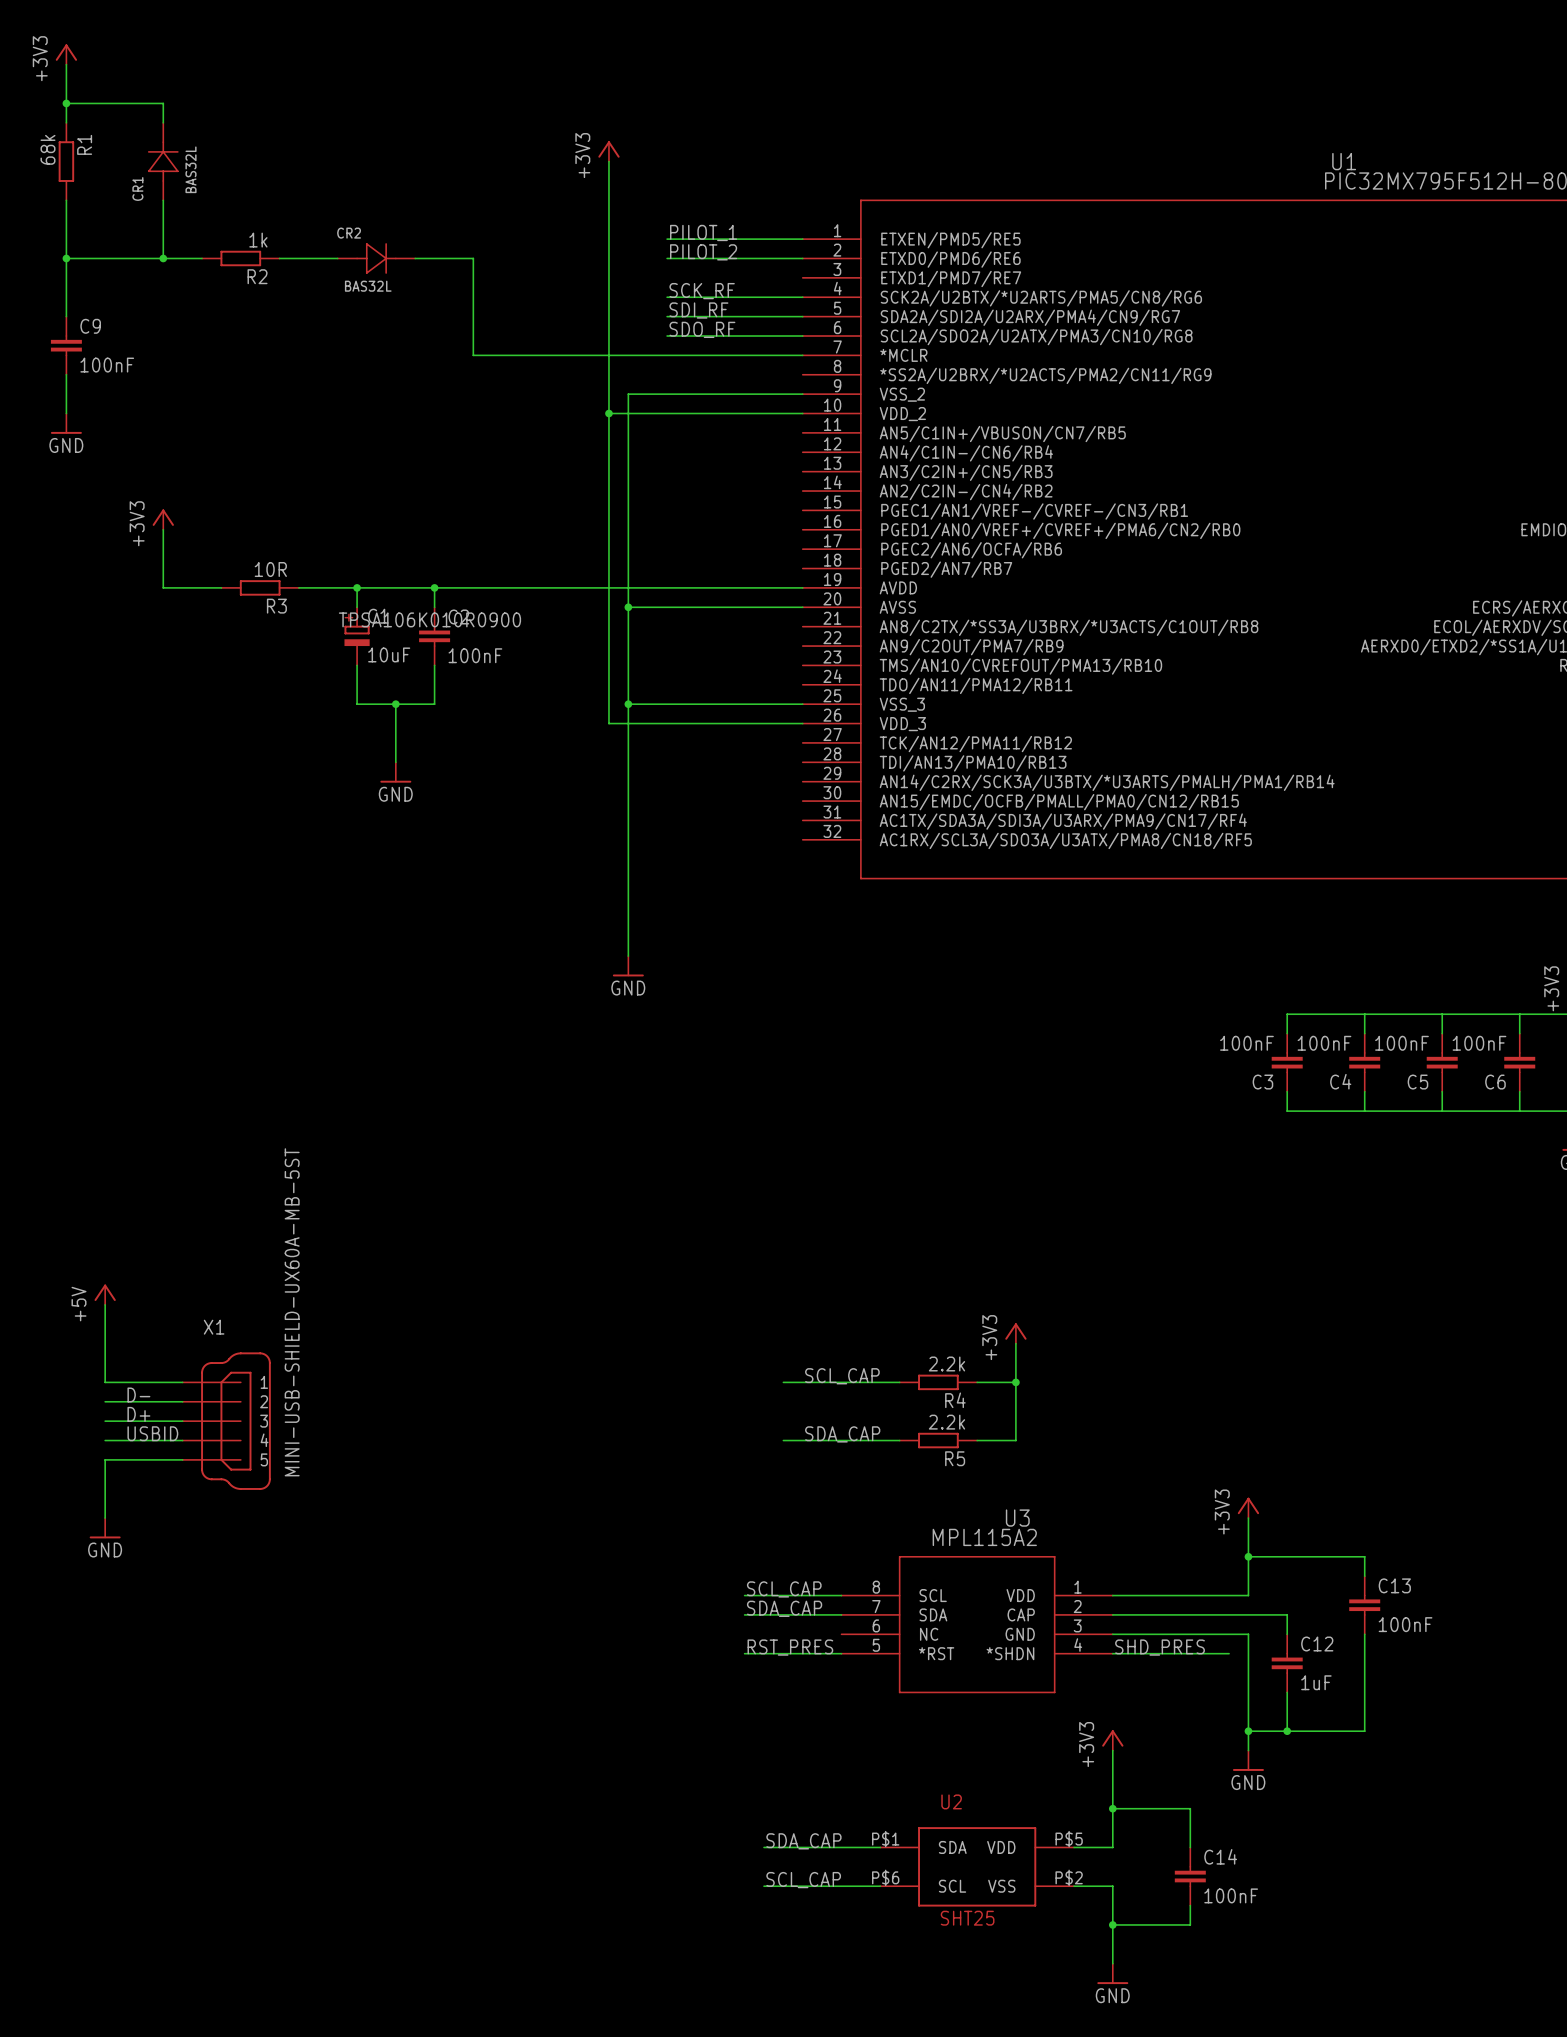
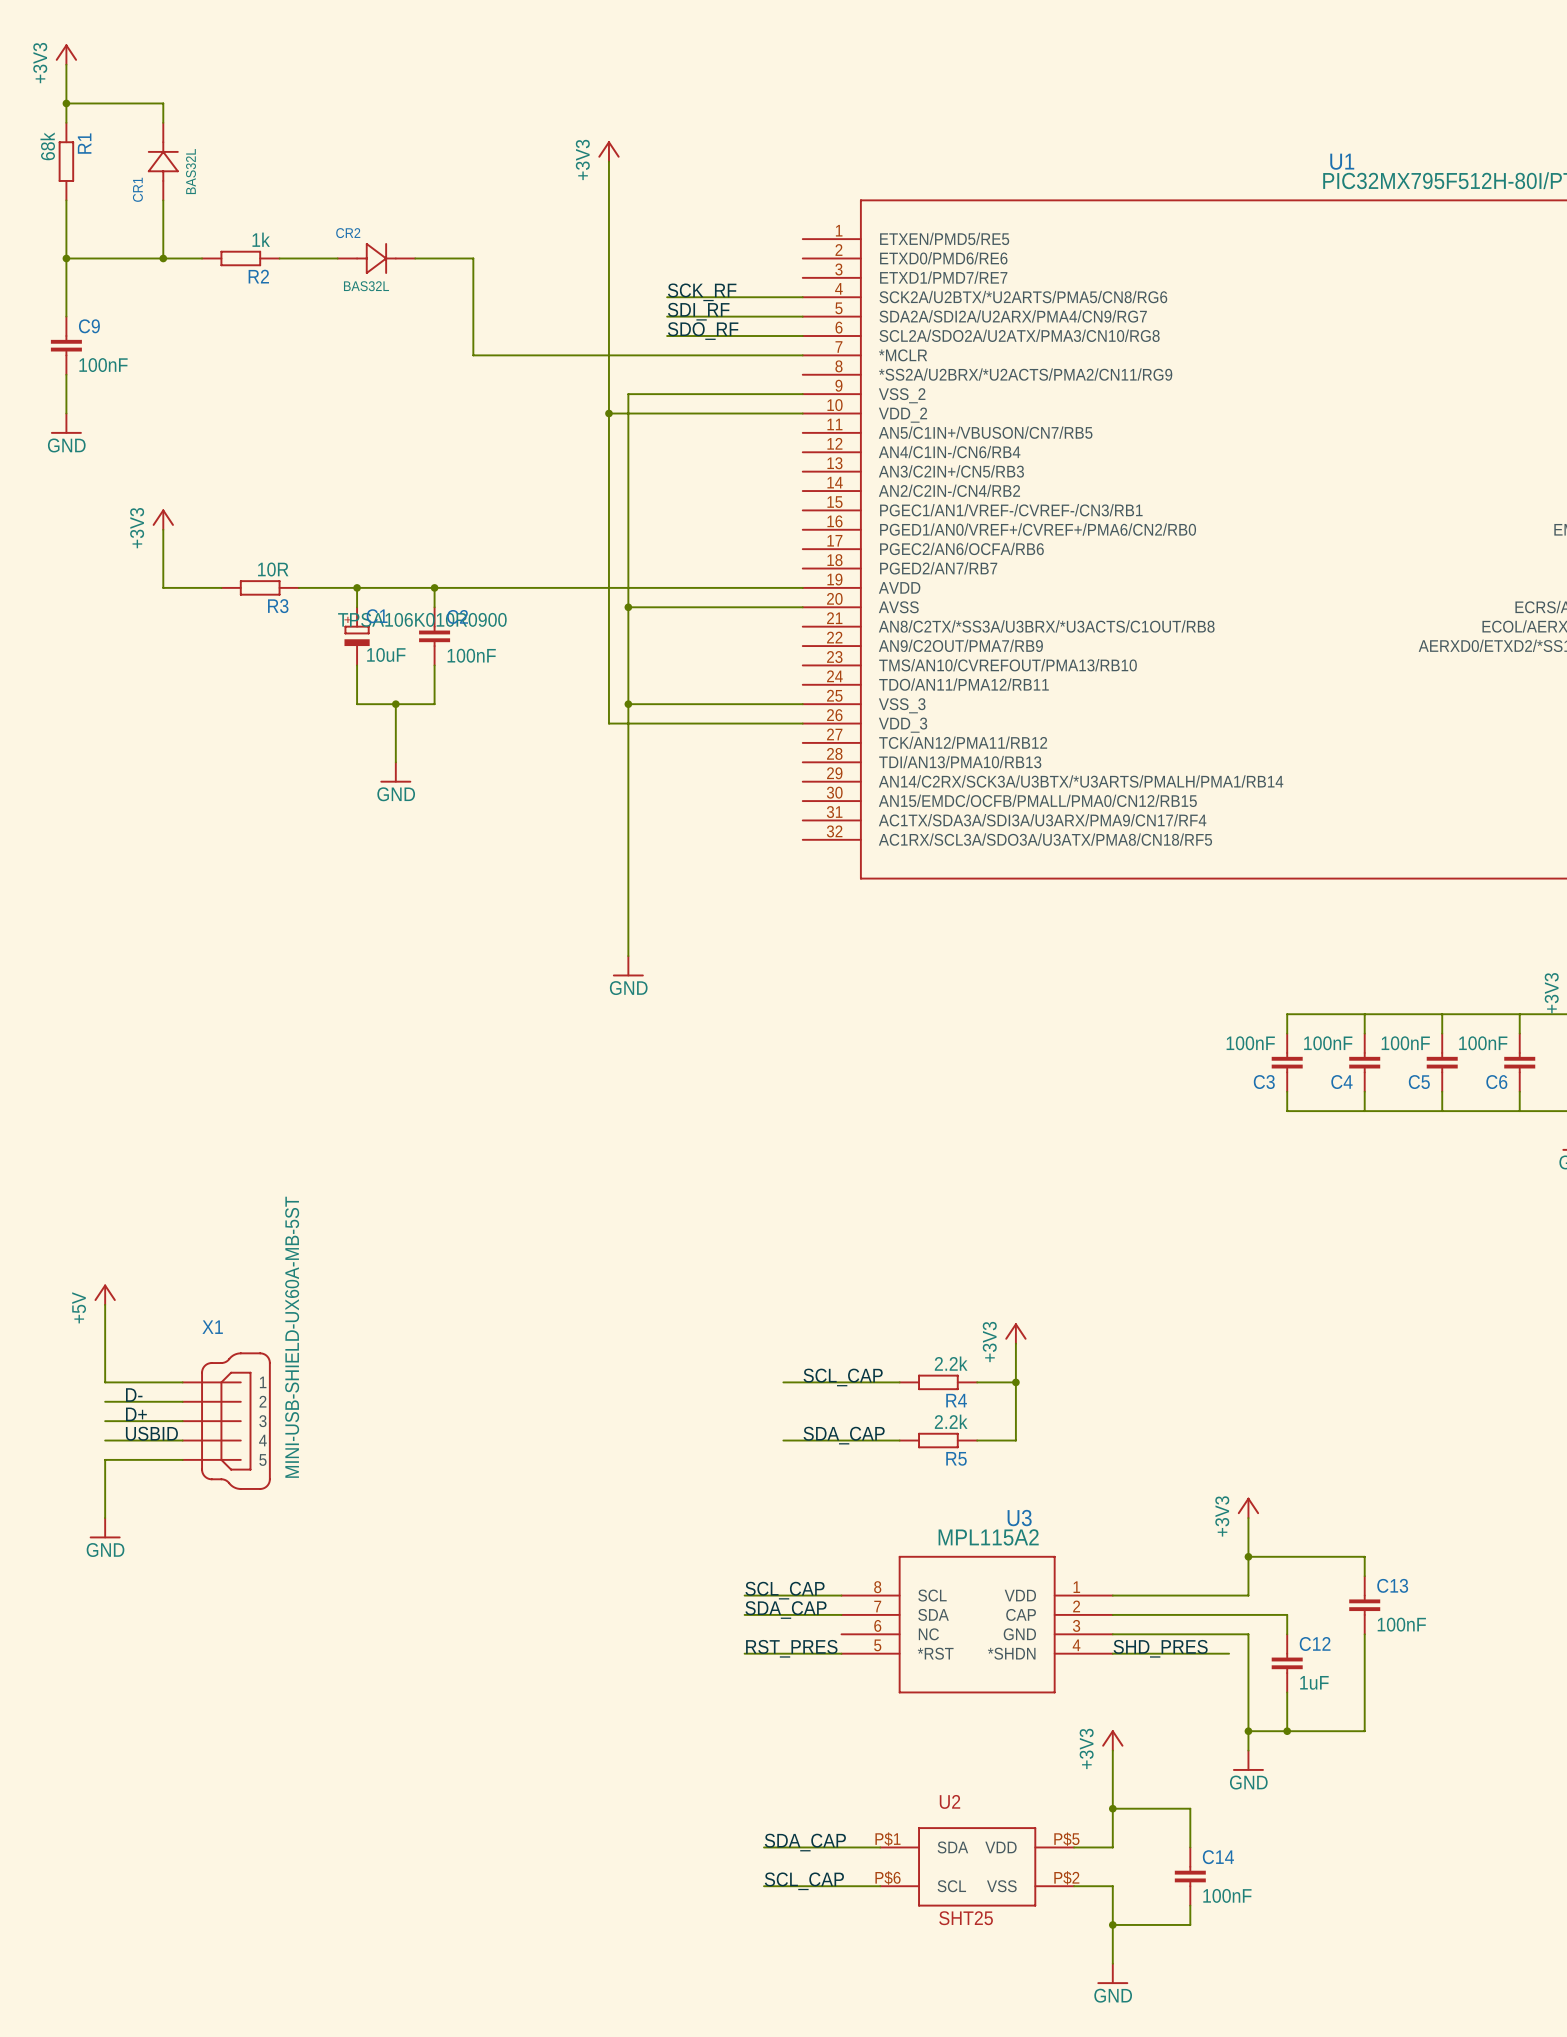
label: PILOT_1 (703, 232) -> none
wire: (667, 239) (802, 239) -> none
label: PILOT_2 (703, 252) -> none
wire: (667, 258) (802, 258) -> none

